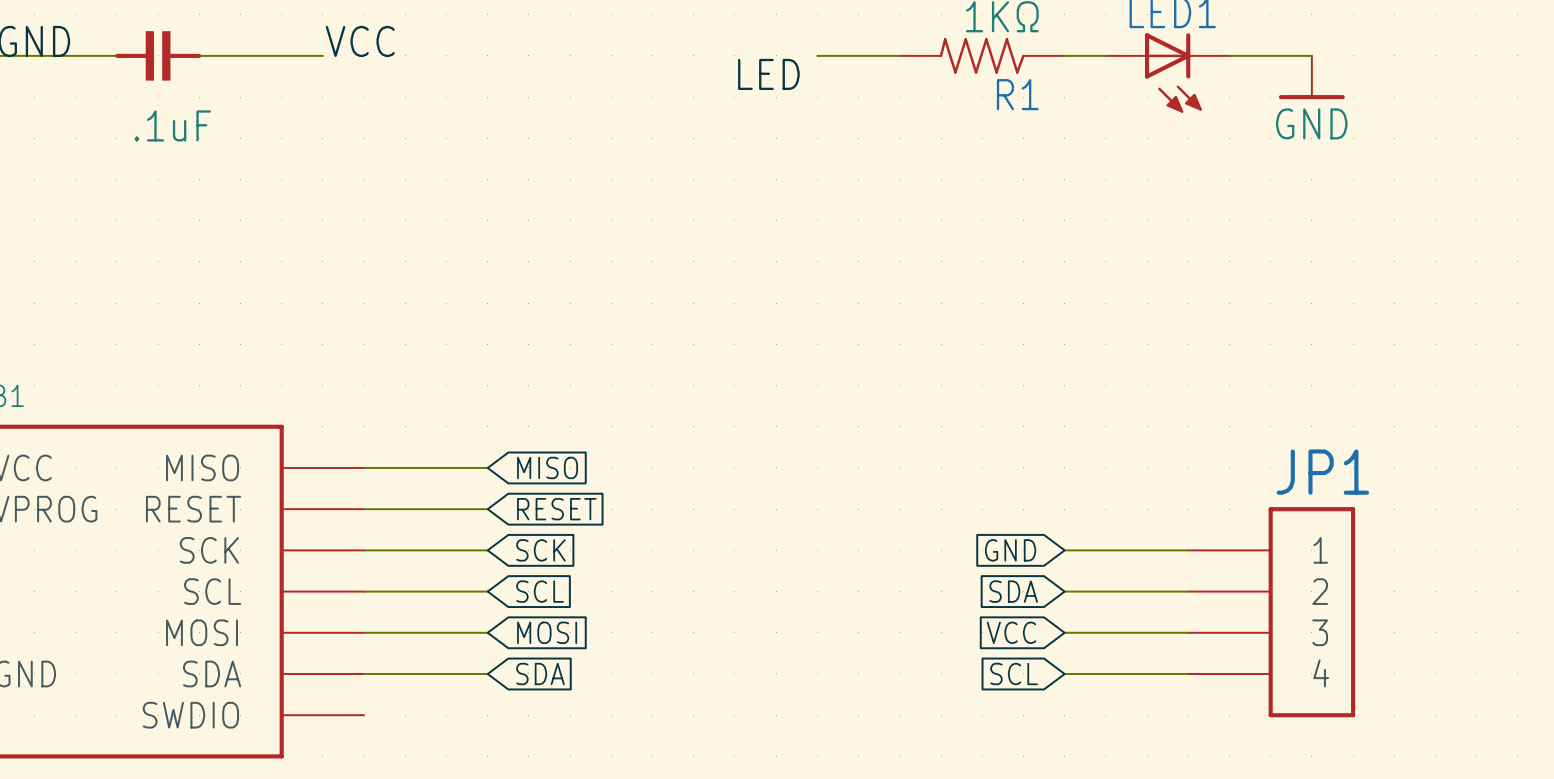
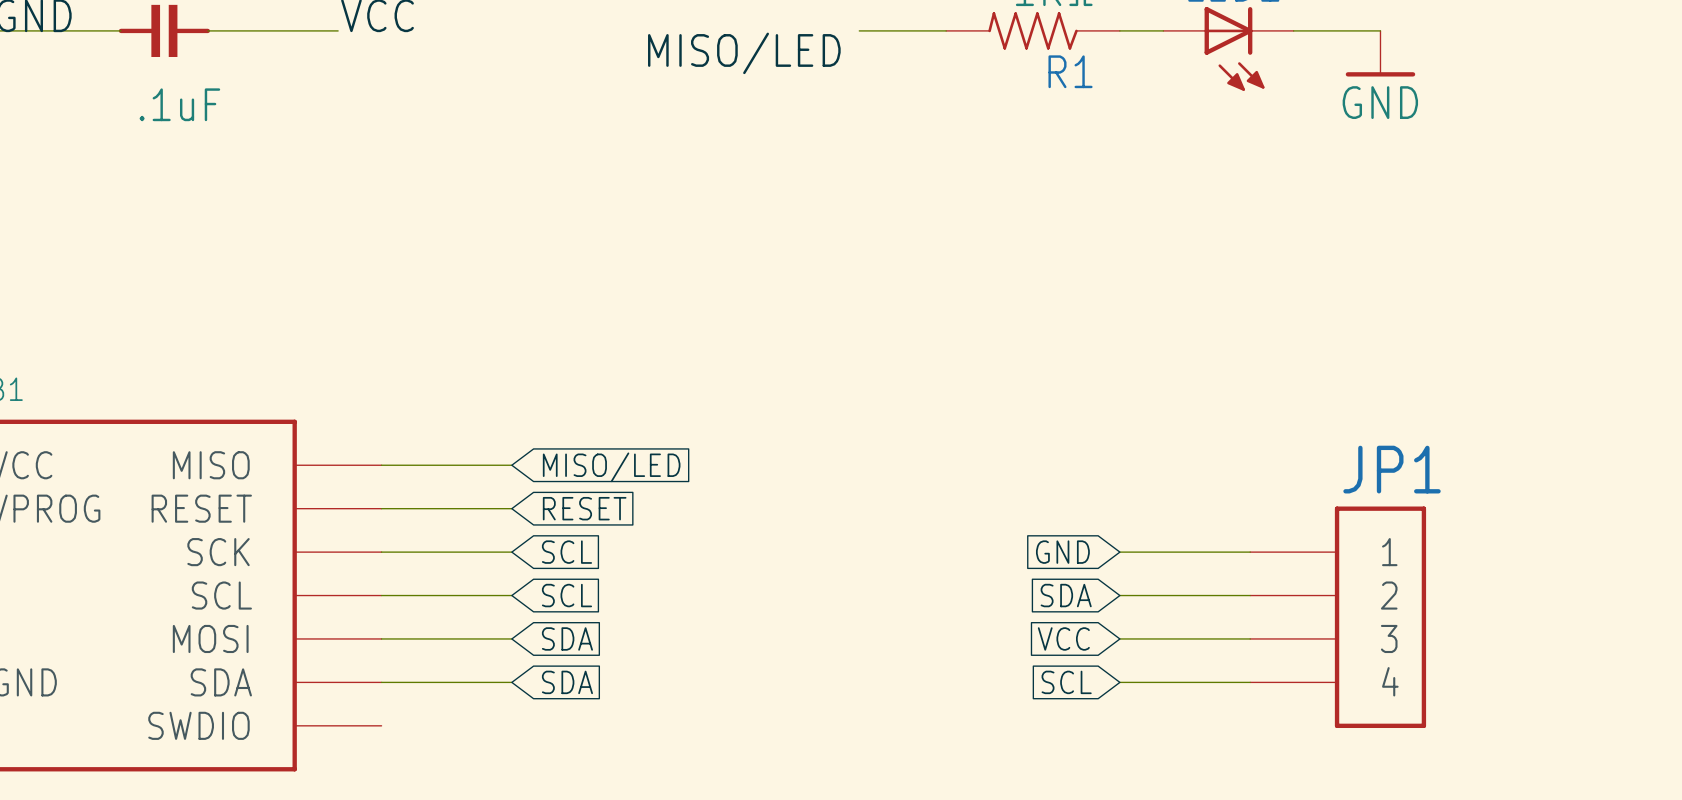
label: LED (768, 74) -> MISO/LED (744, 53)
global label: MISO (547, 467) -> MISO/LED (611, 467)
global label: SCK (540, 550) -> SCL (566, 552)
global label: MOSI (547, 632) -> SDA (567, 638)

